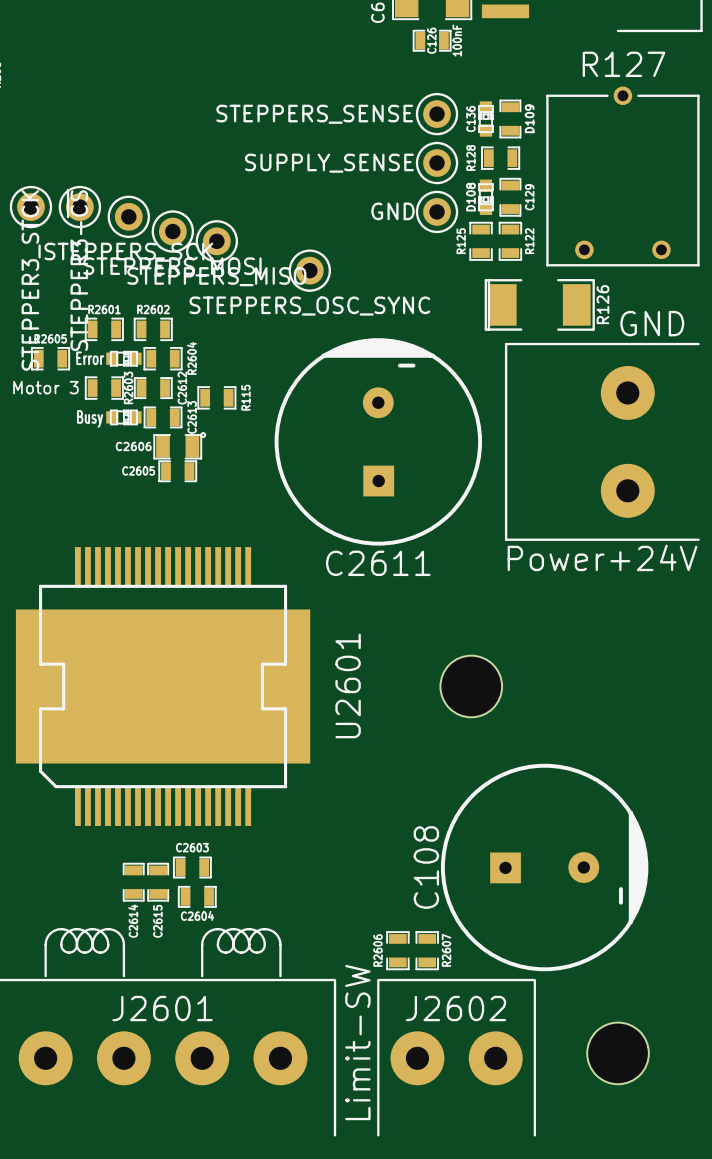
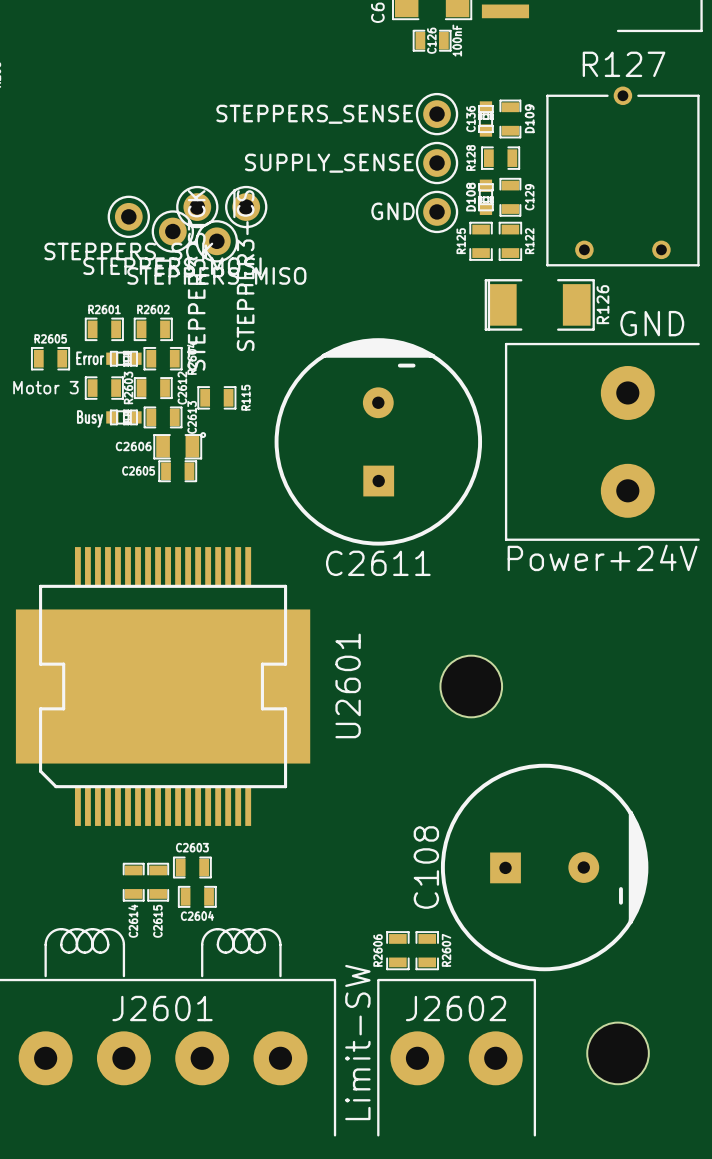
part position: (30, 207) -> (197, 207)
part position: (79, 207) -> (246, 207)
part: STEPPERS_OSC_SYNC (309, 270) -> none

